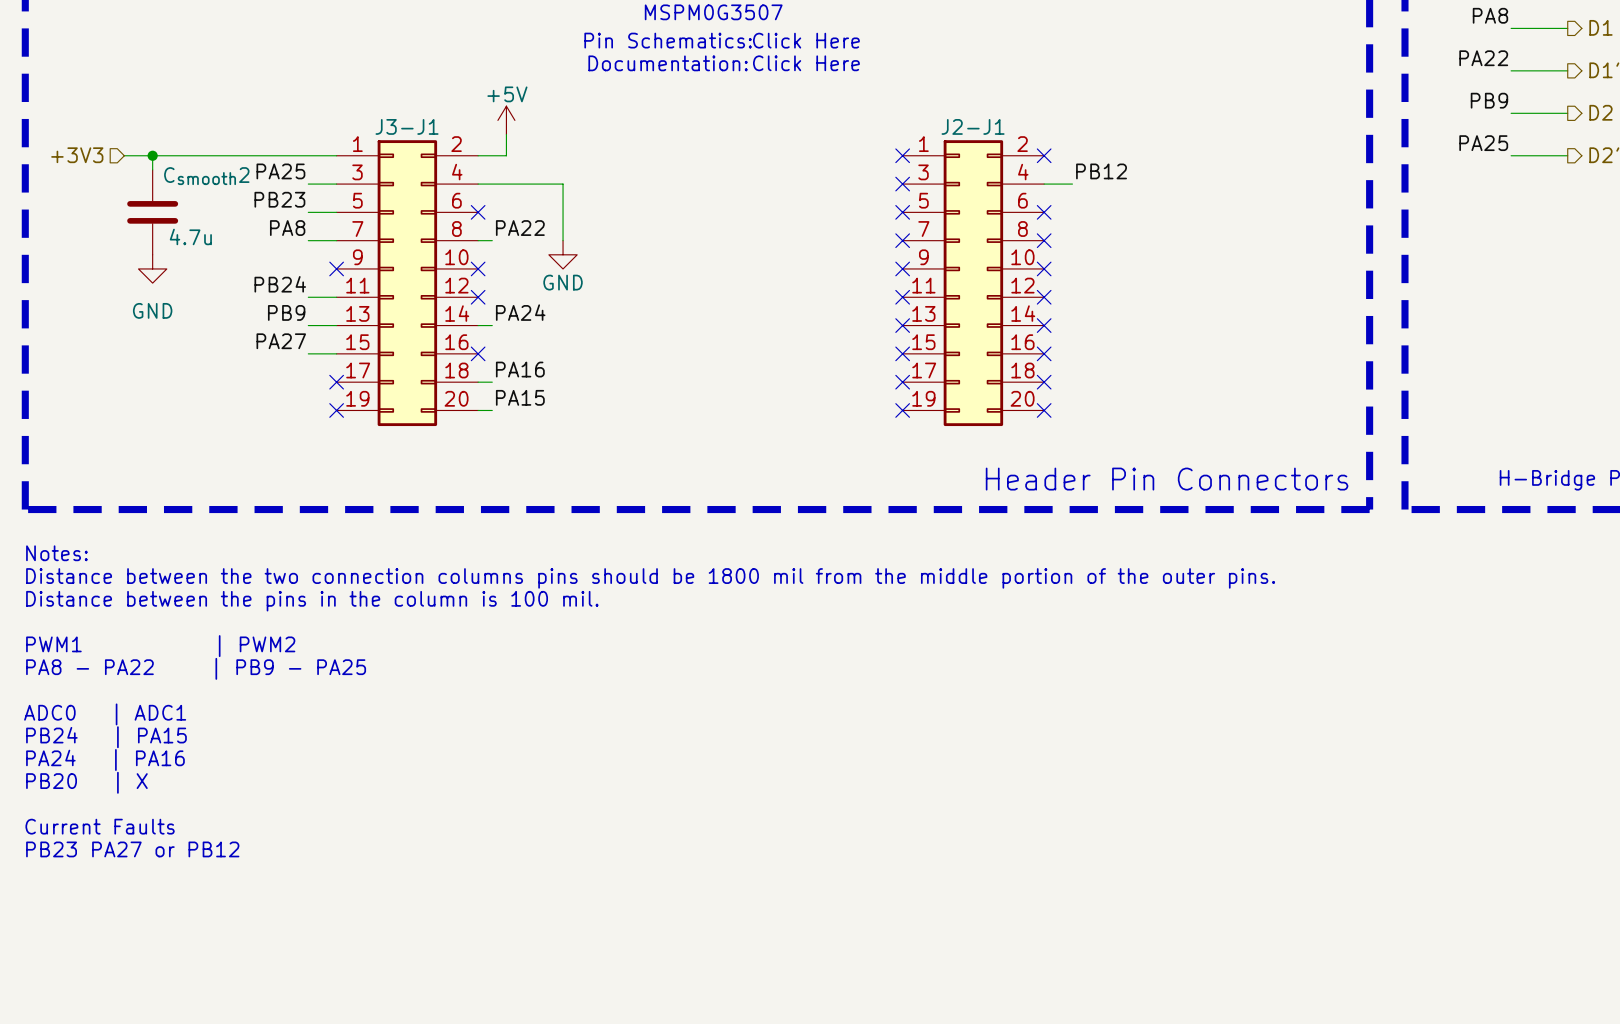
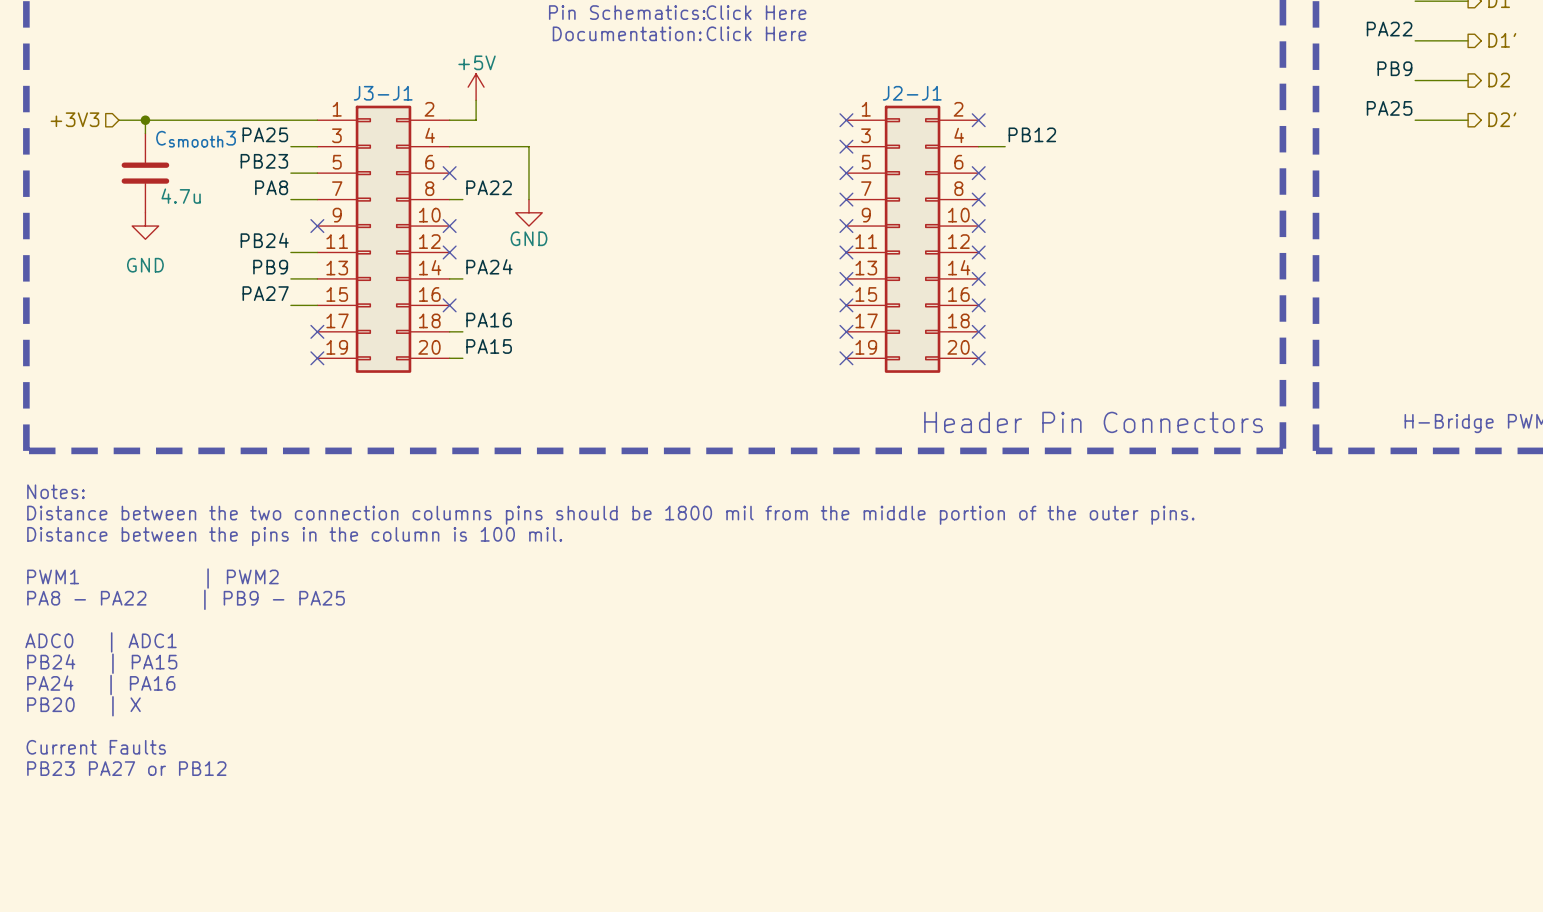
Csmooth2 name: Csmooth2 (206, 176) -> Csmooth3 (196, 139)

